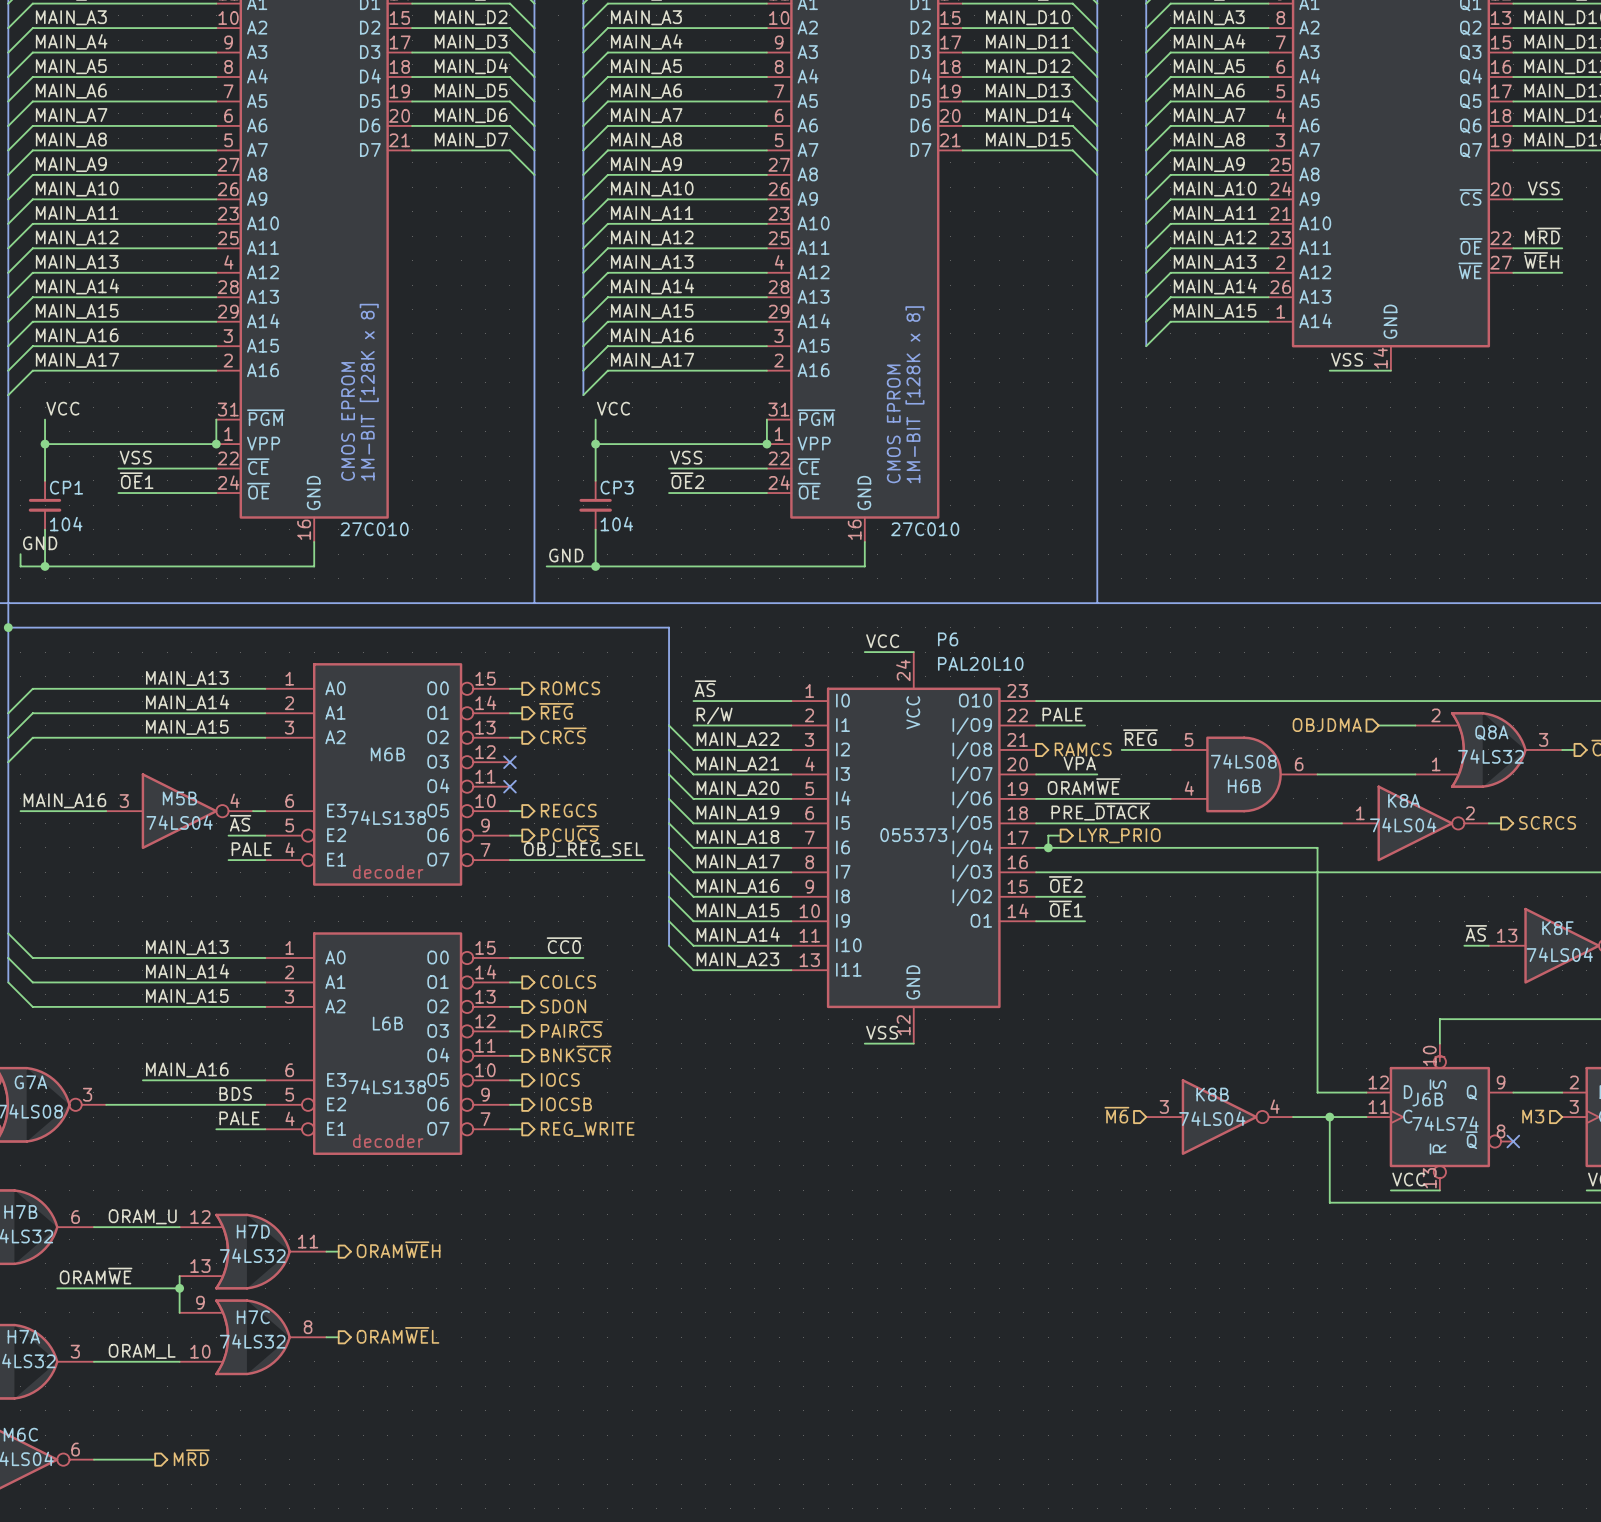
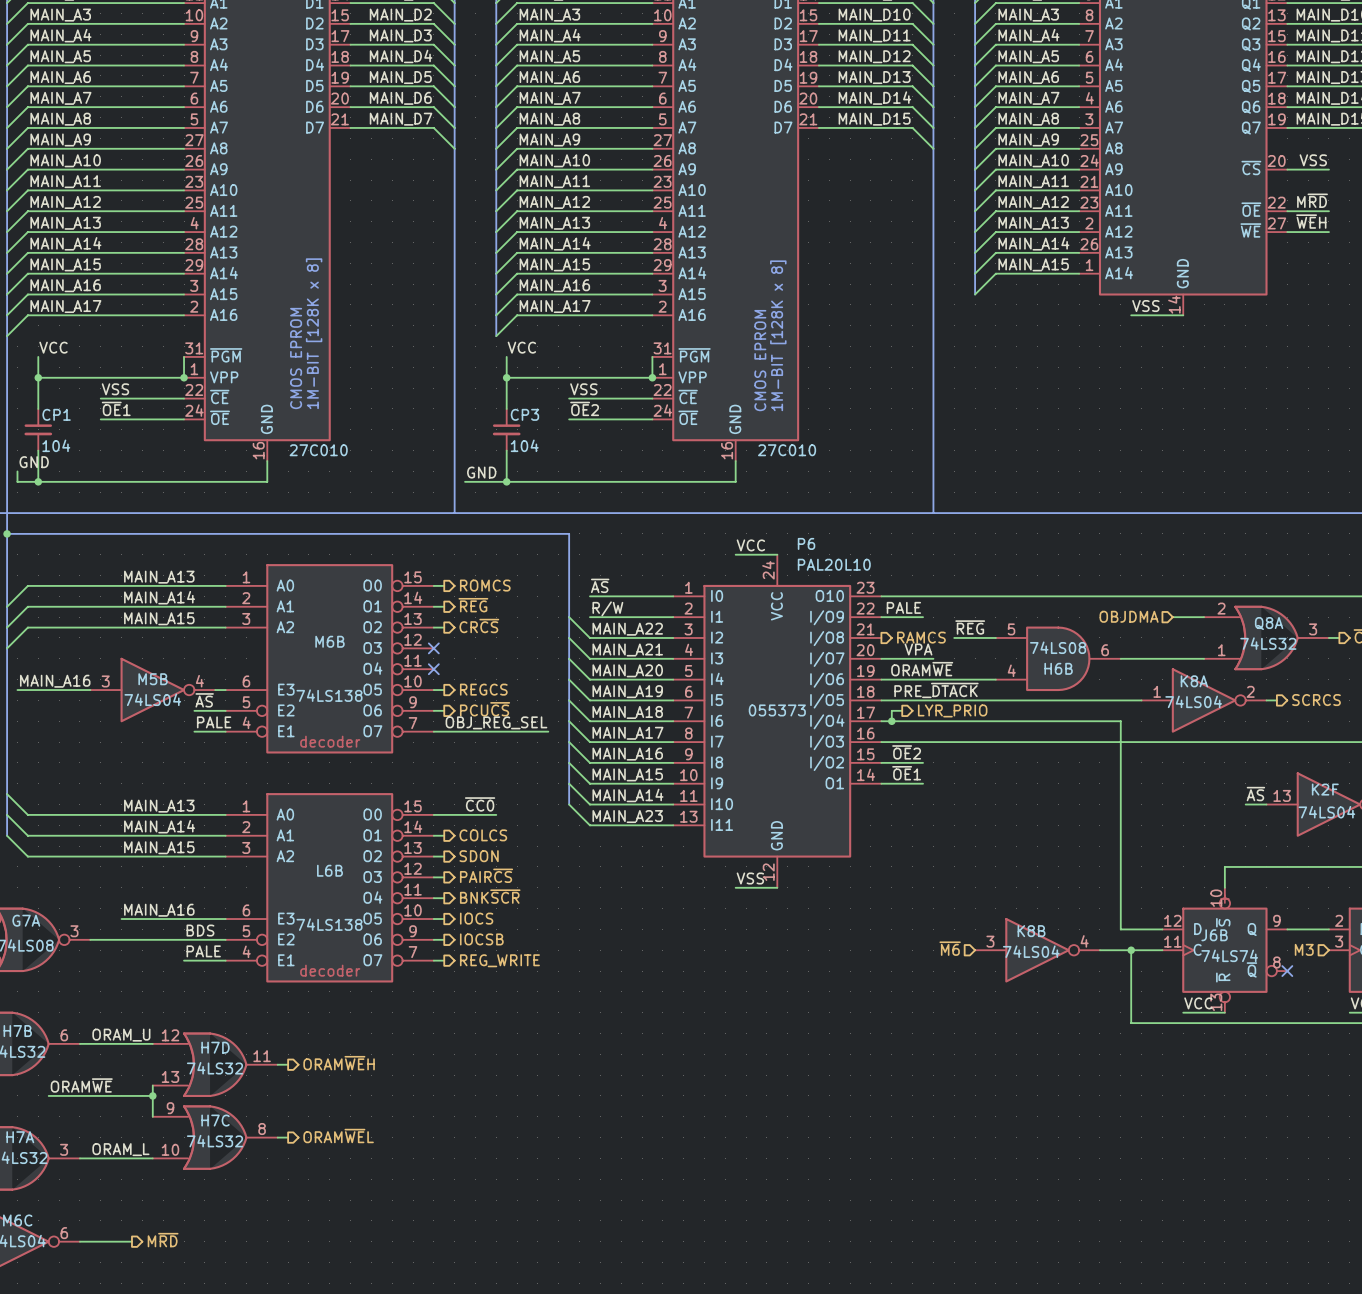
K8F name: K8F (1557, 928) -> K2F (1325, 789)

